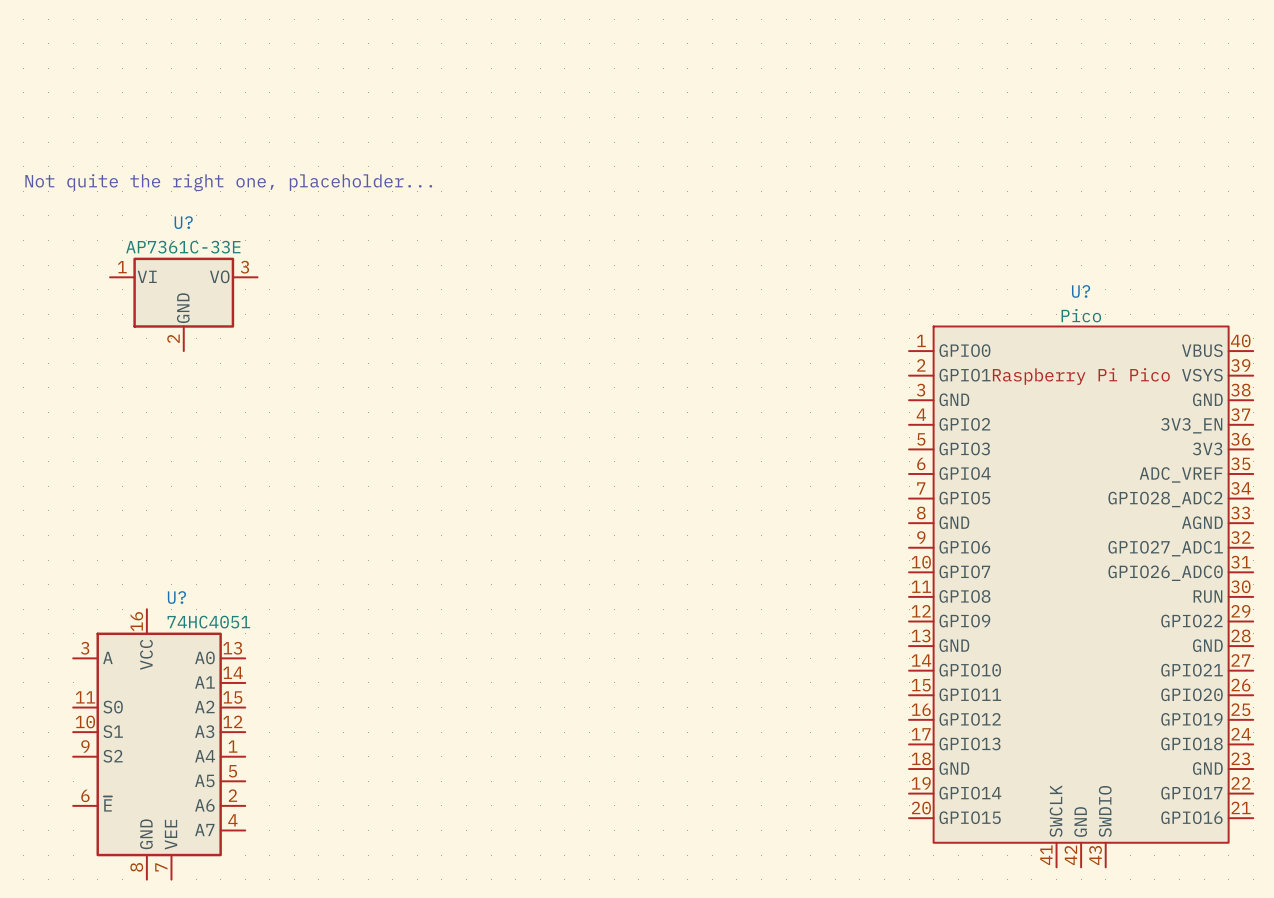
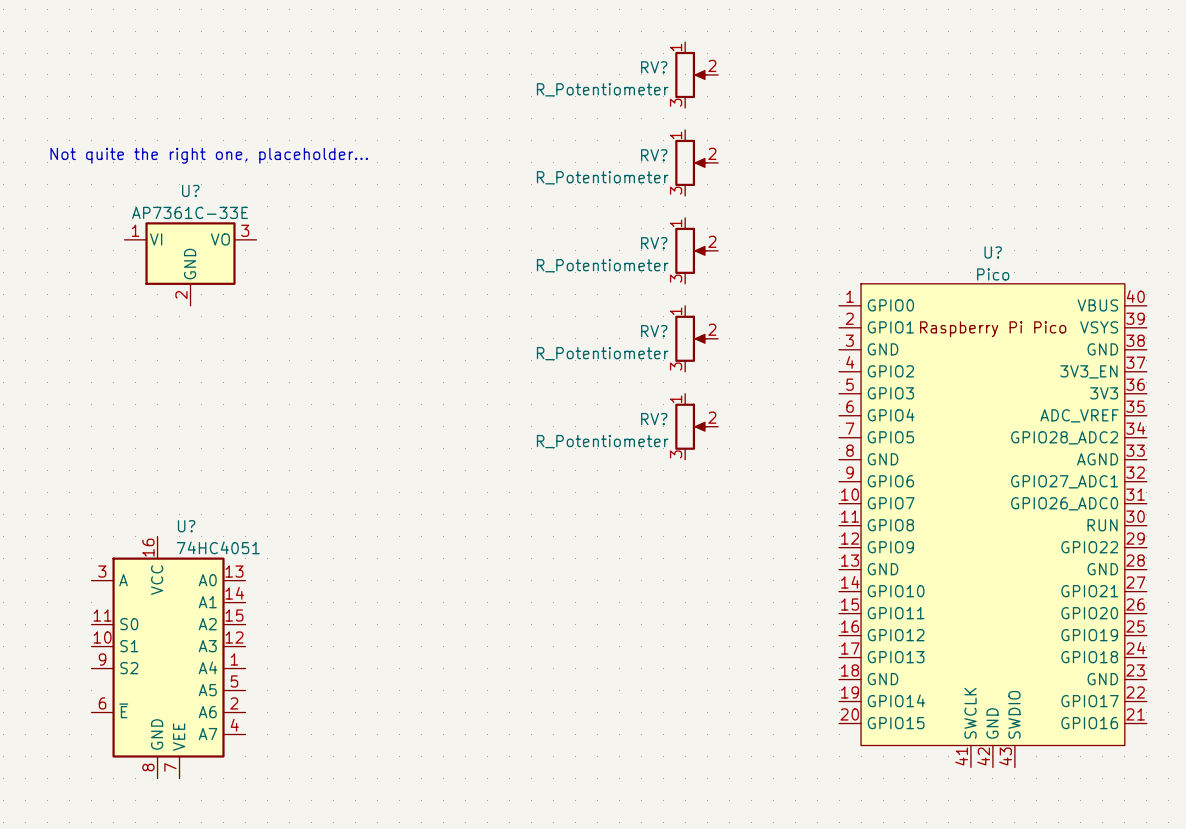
RV?: none -> R_Potentiometer (696, 74)
RV?: none -> R_Potentiometer (696, 162)
RV?: none -> R_Potentiometer (696, 250)
RV?: none -> R_Potentiometer (696, 338)
RV?: none -> R_Potentiometer (696, 426)

